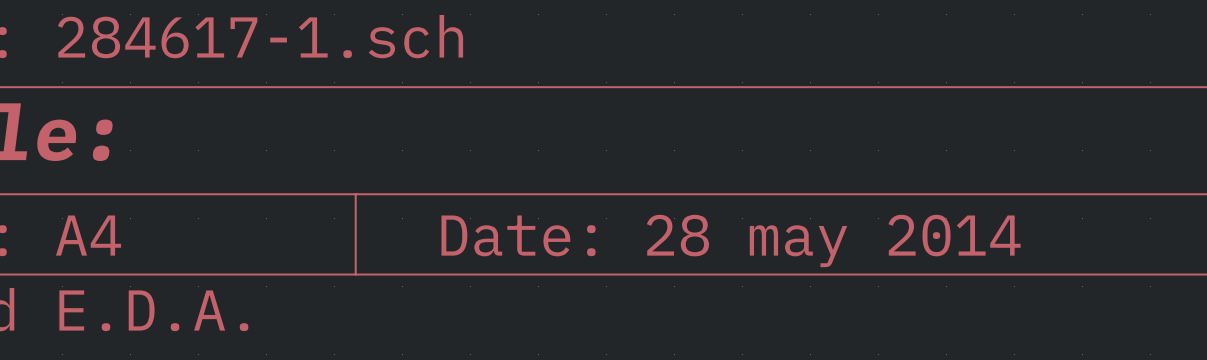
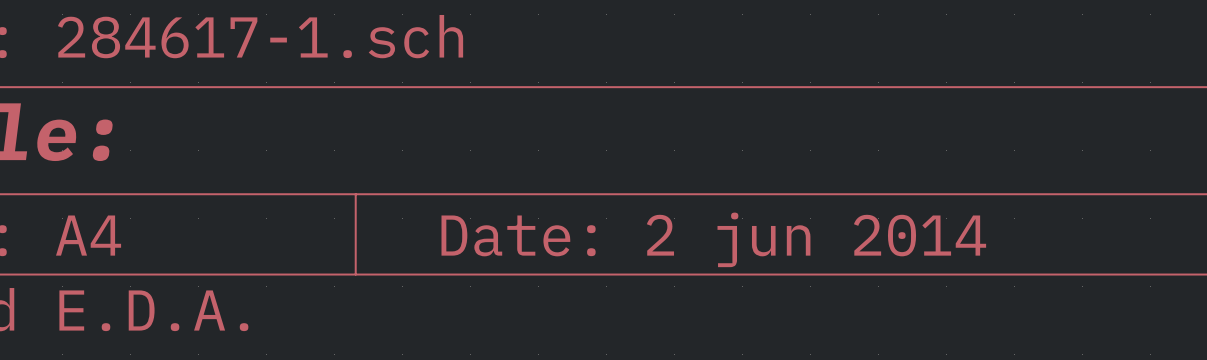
title block: Date: 28 may 2014 (731, 240) -> Date: 2 jun 2014 (713, 239)

